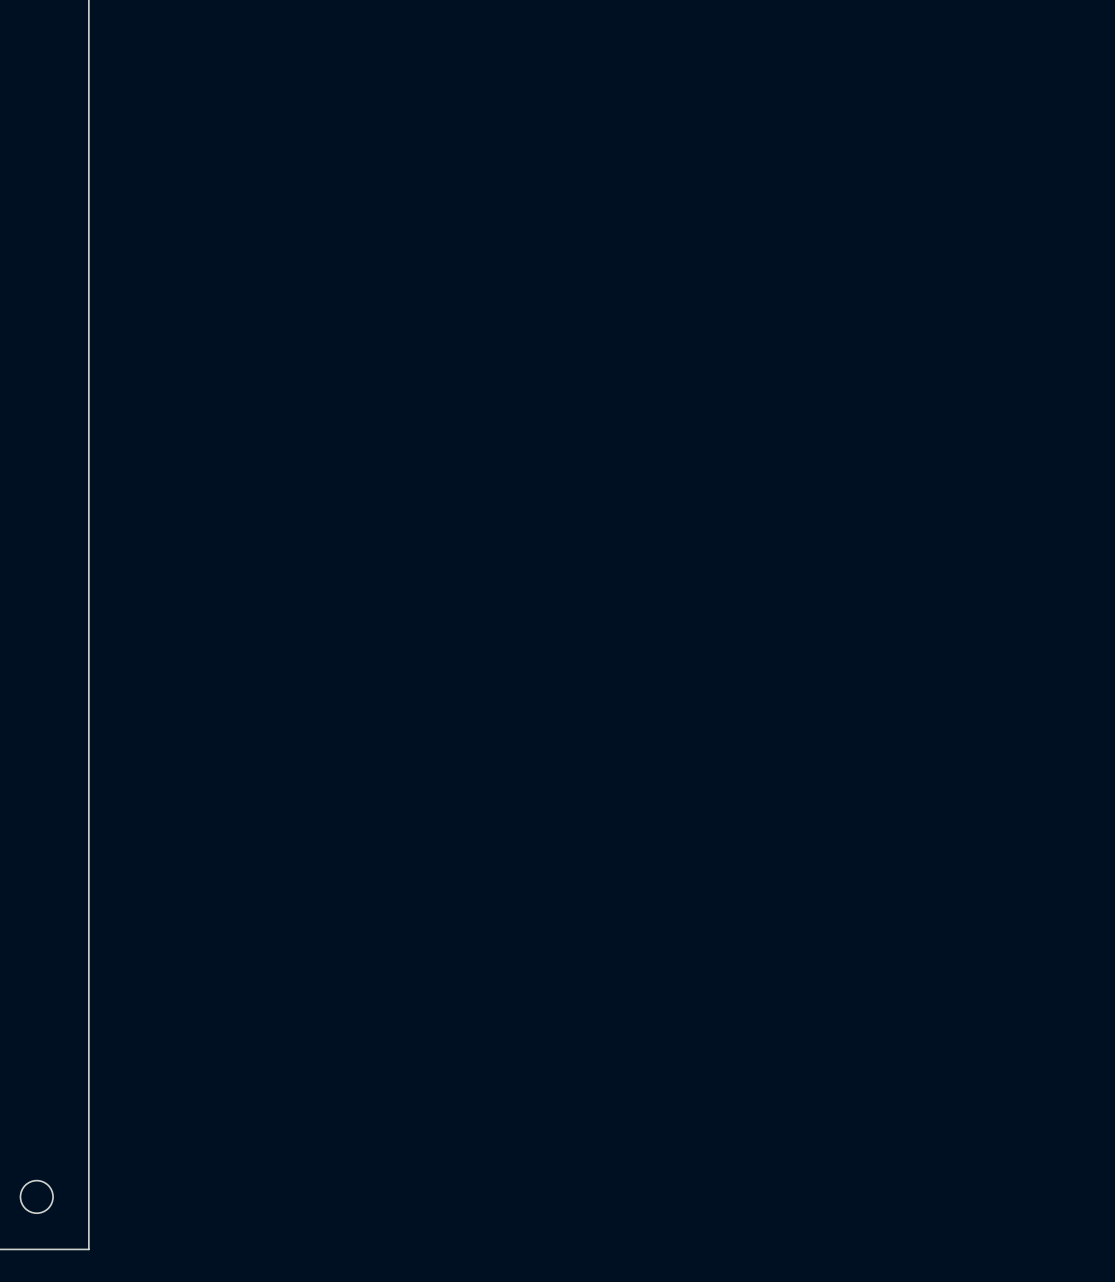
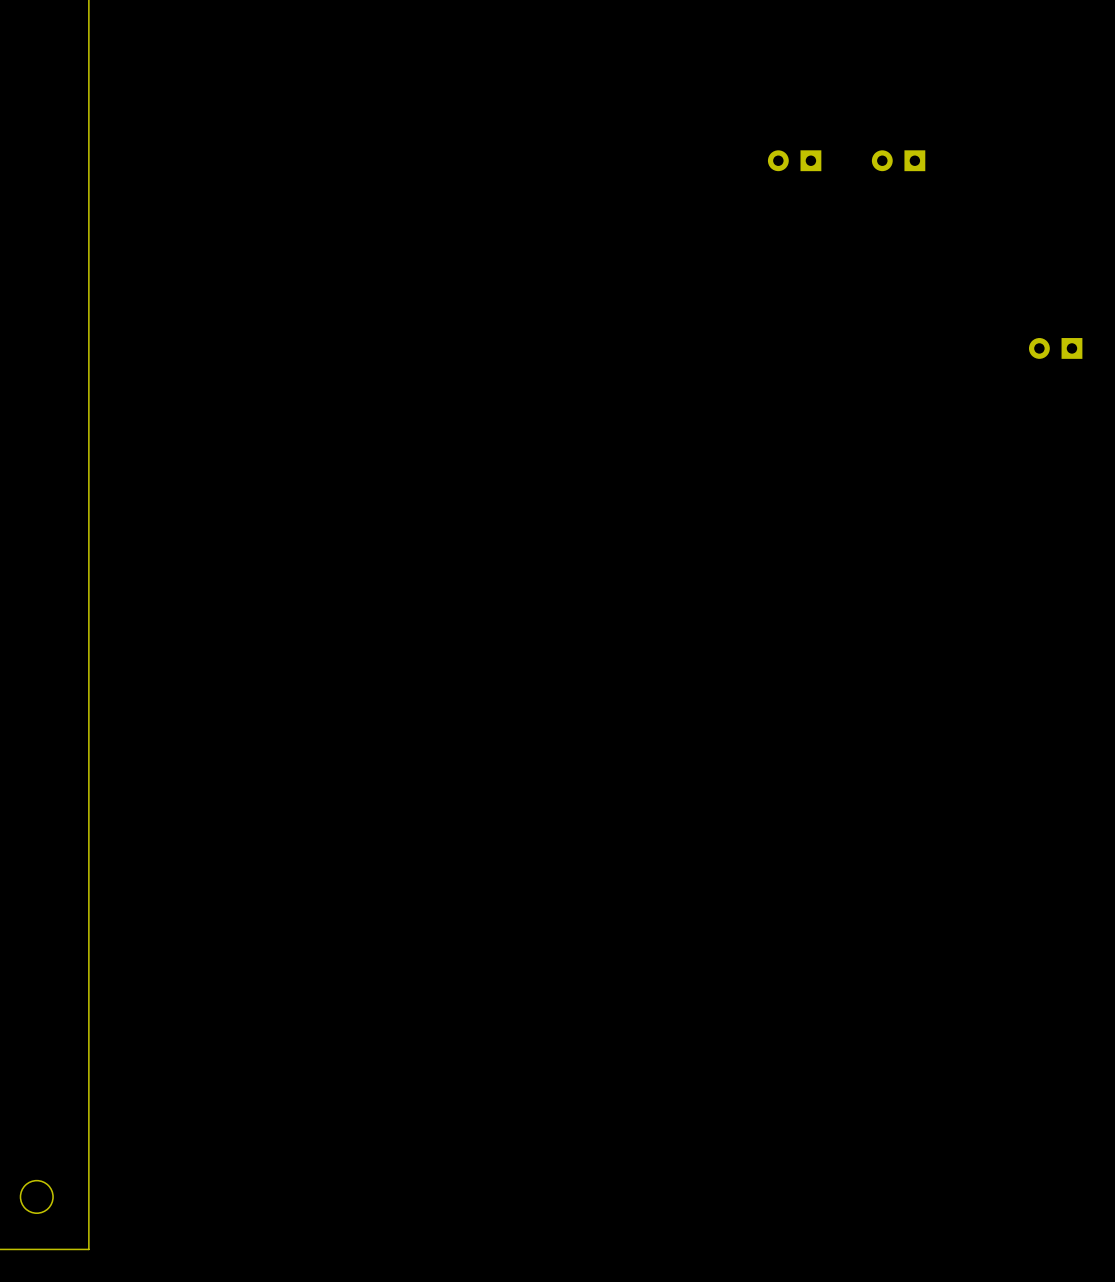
part: none -> (794, 160)
part: none -> (898, 160)
part: none -> (1055, 348)

